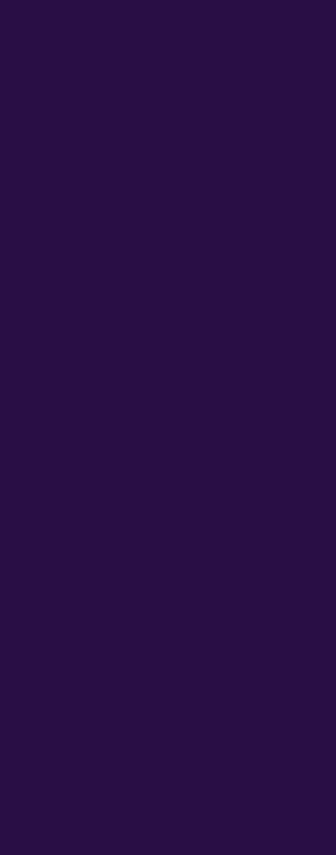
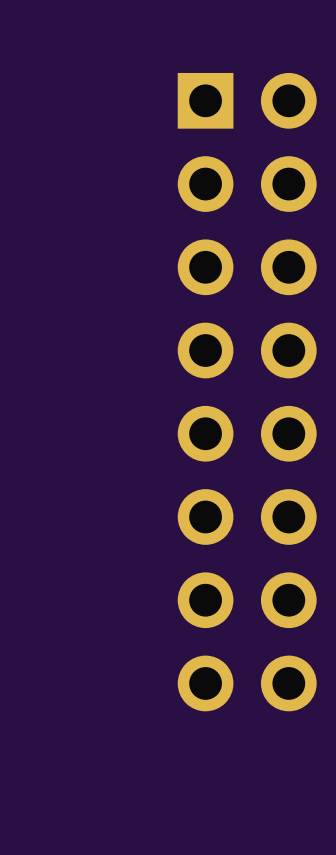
part: none -> (247, 392)

